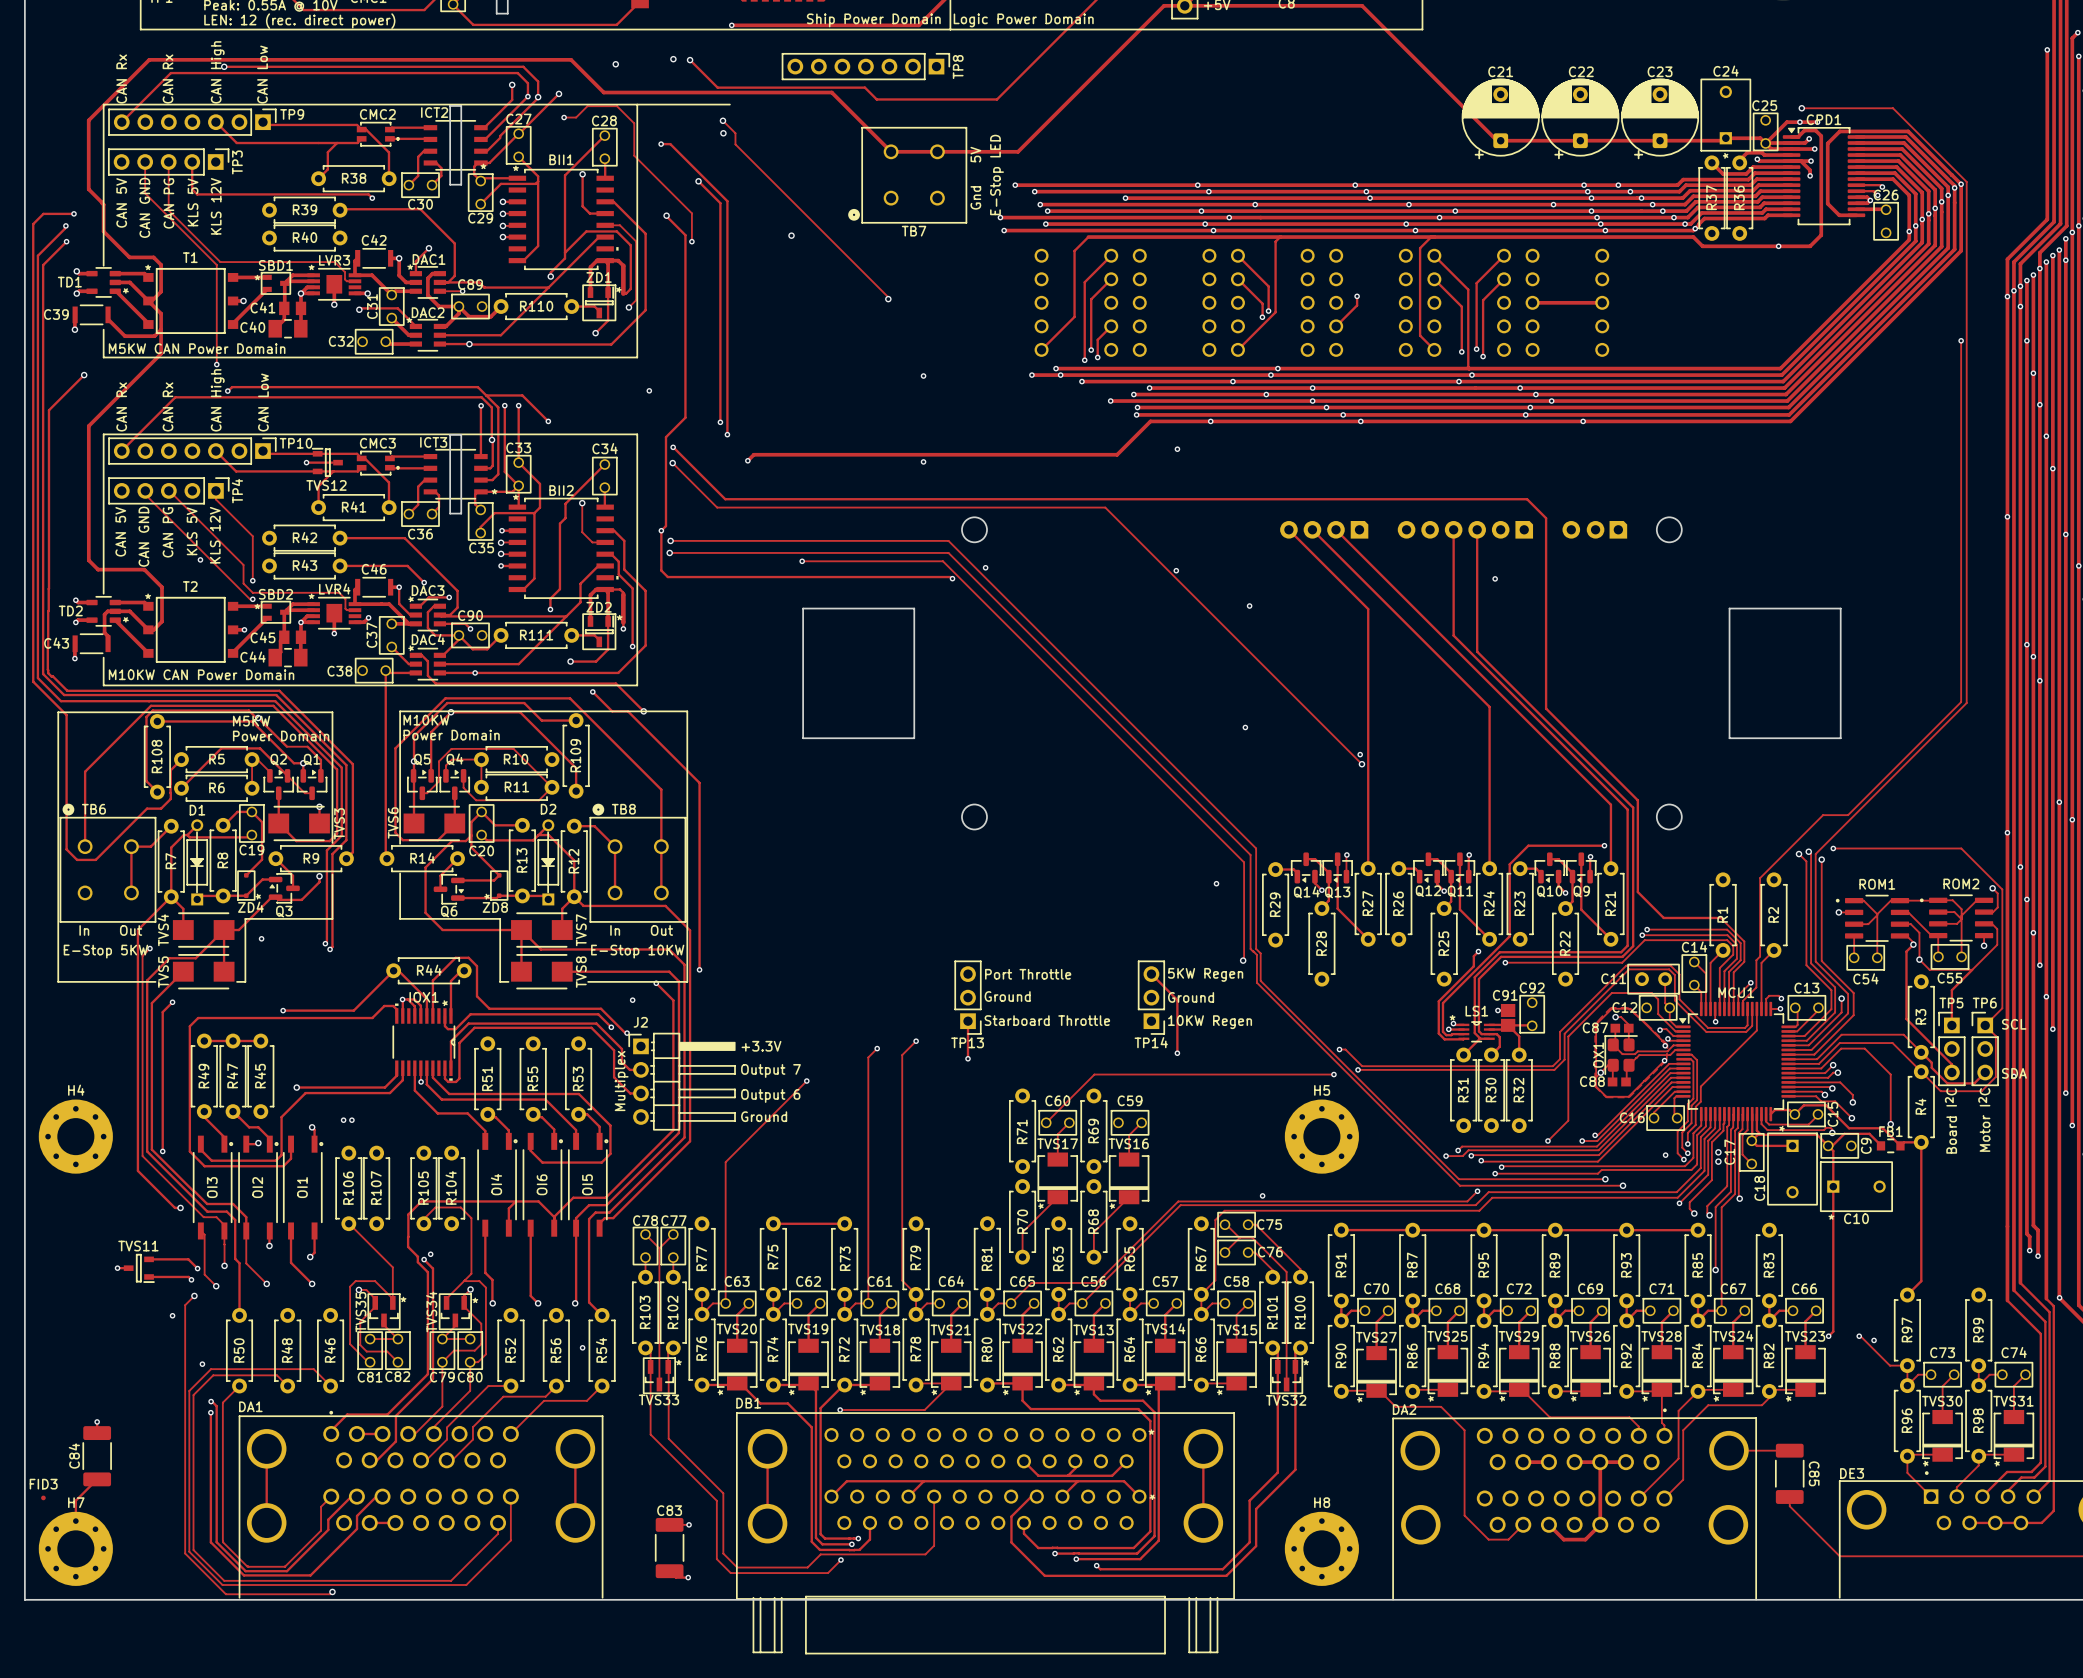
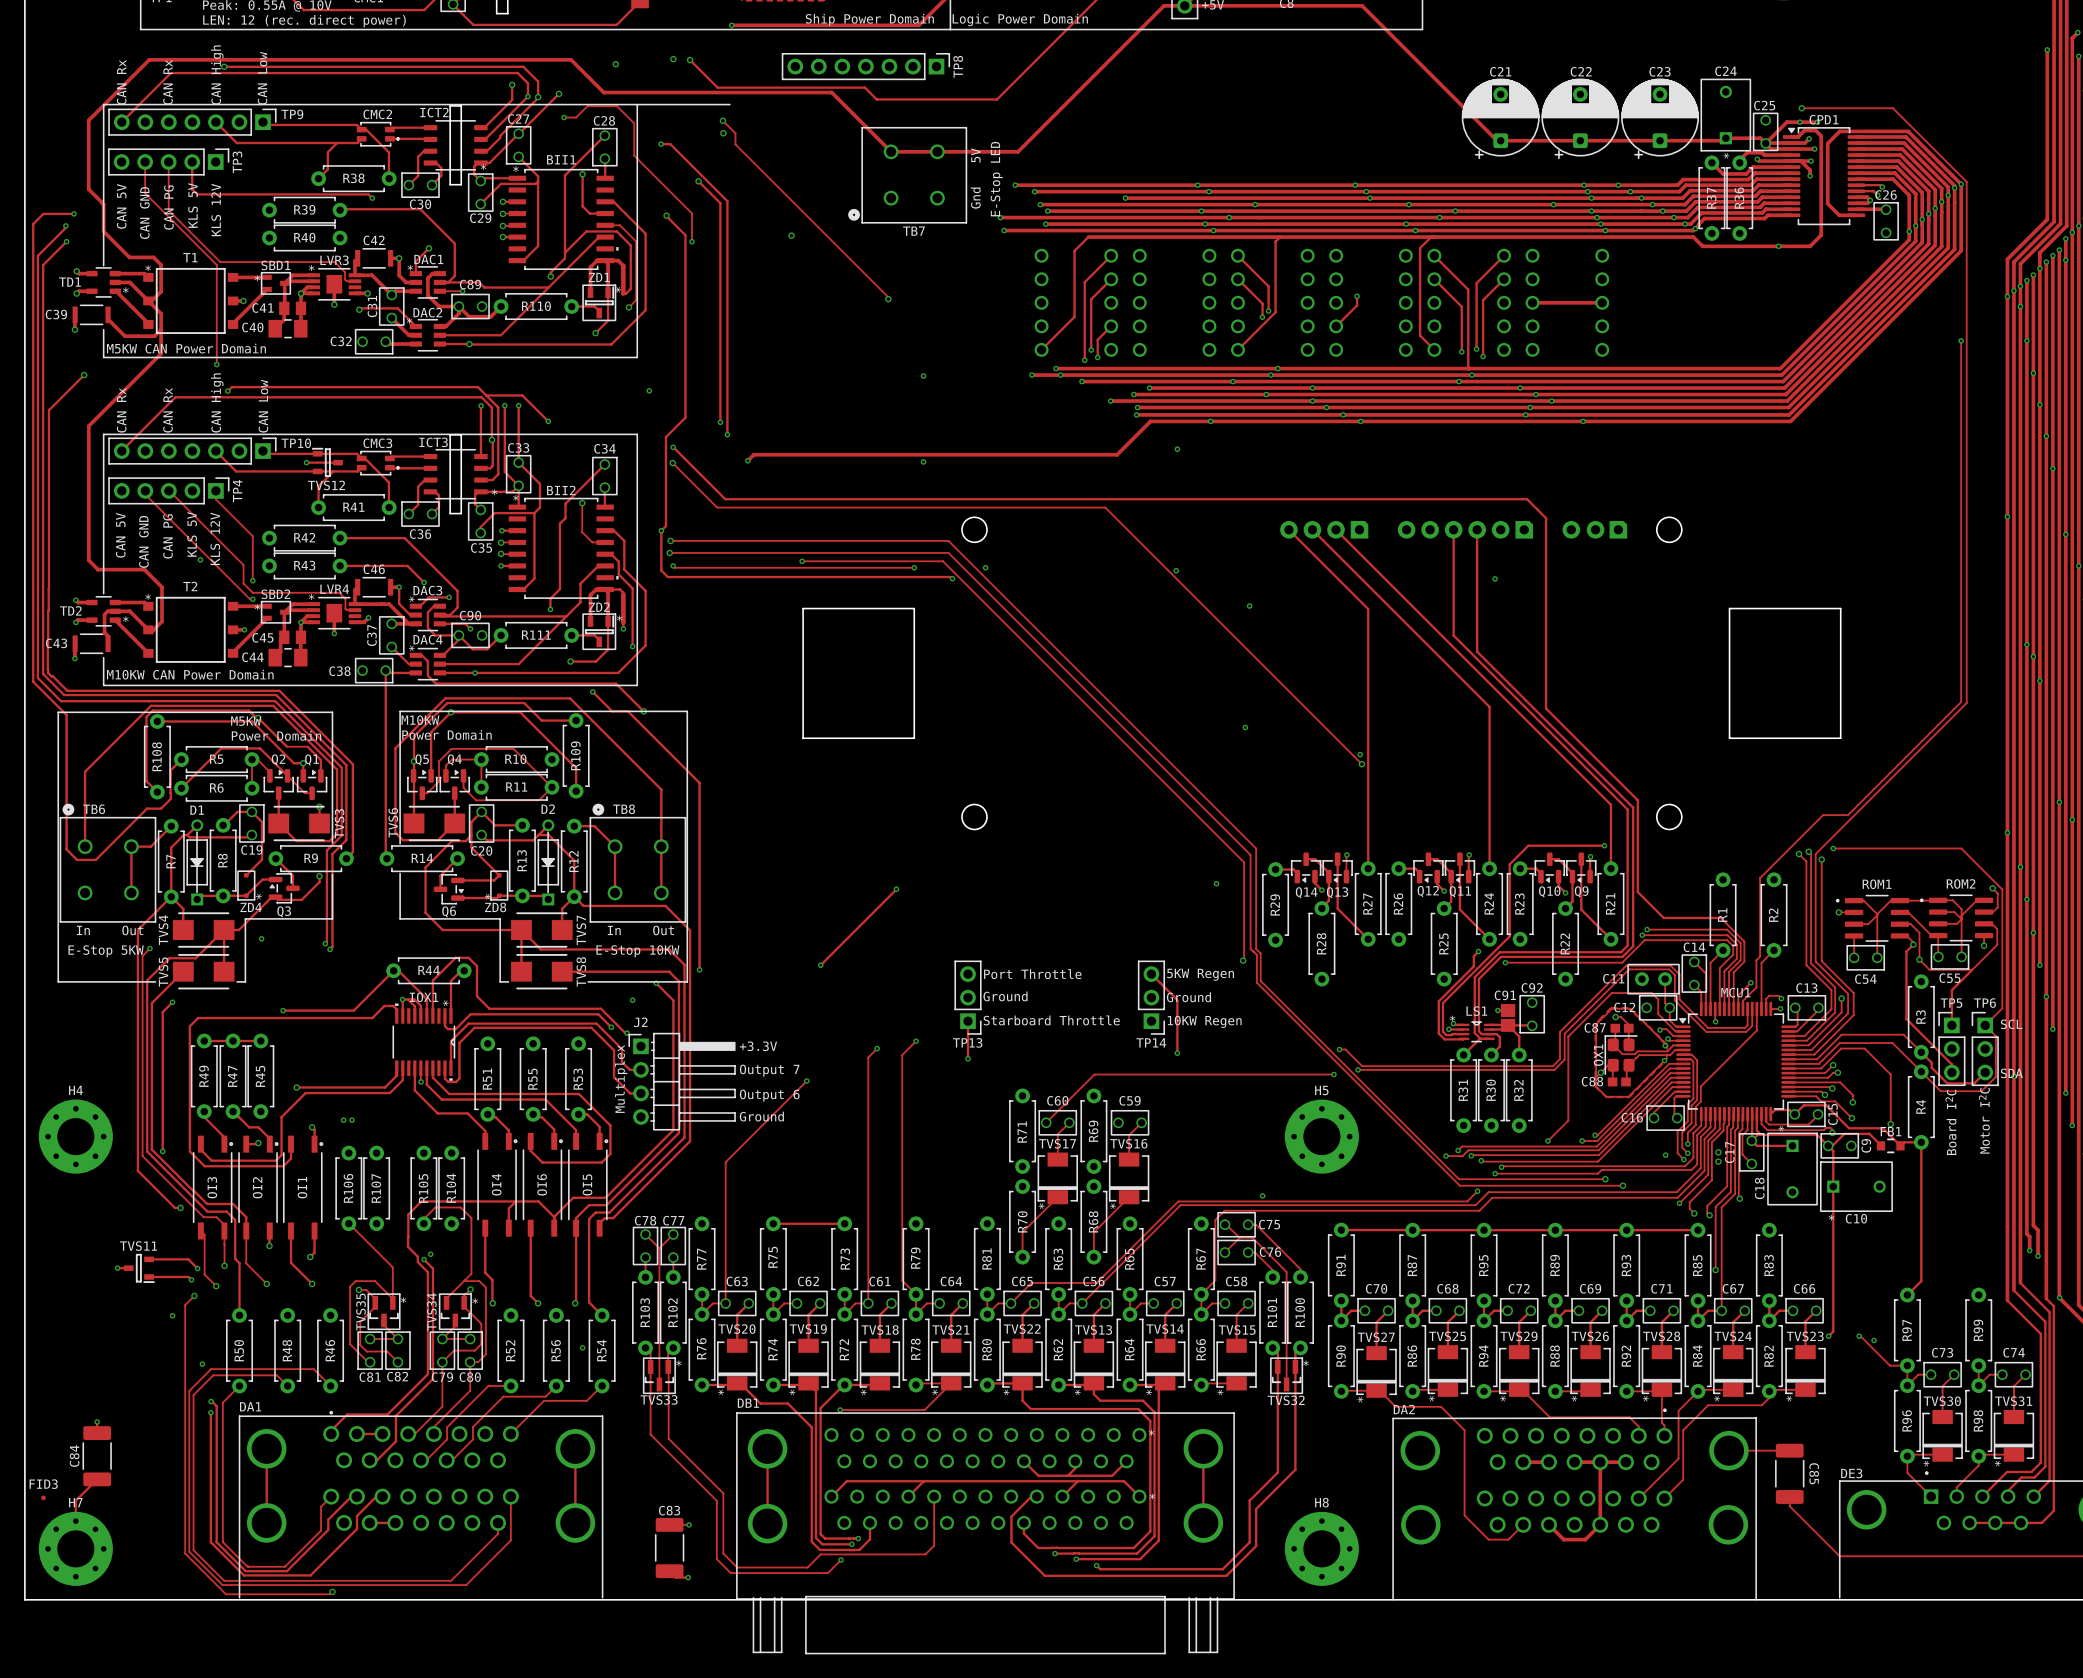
track: none -> (673, 565) (675, 567) (914, 567)
via: none -> (673, 565)
via: none -> (914, 567)
track: none -> (896, 889) (820, 965)
via: none -> (896, 889)
via: none -> (820, 965)

